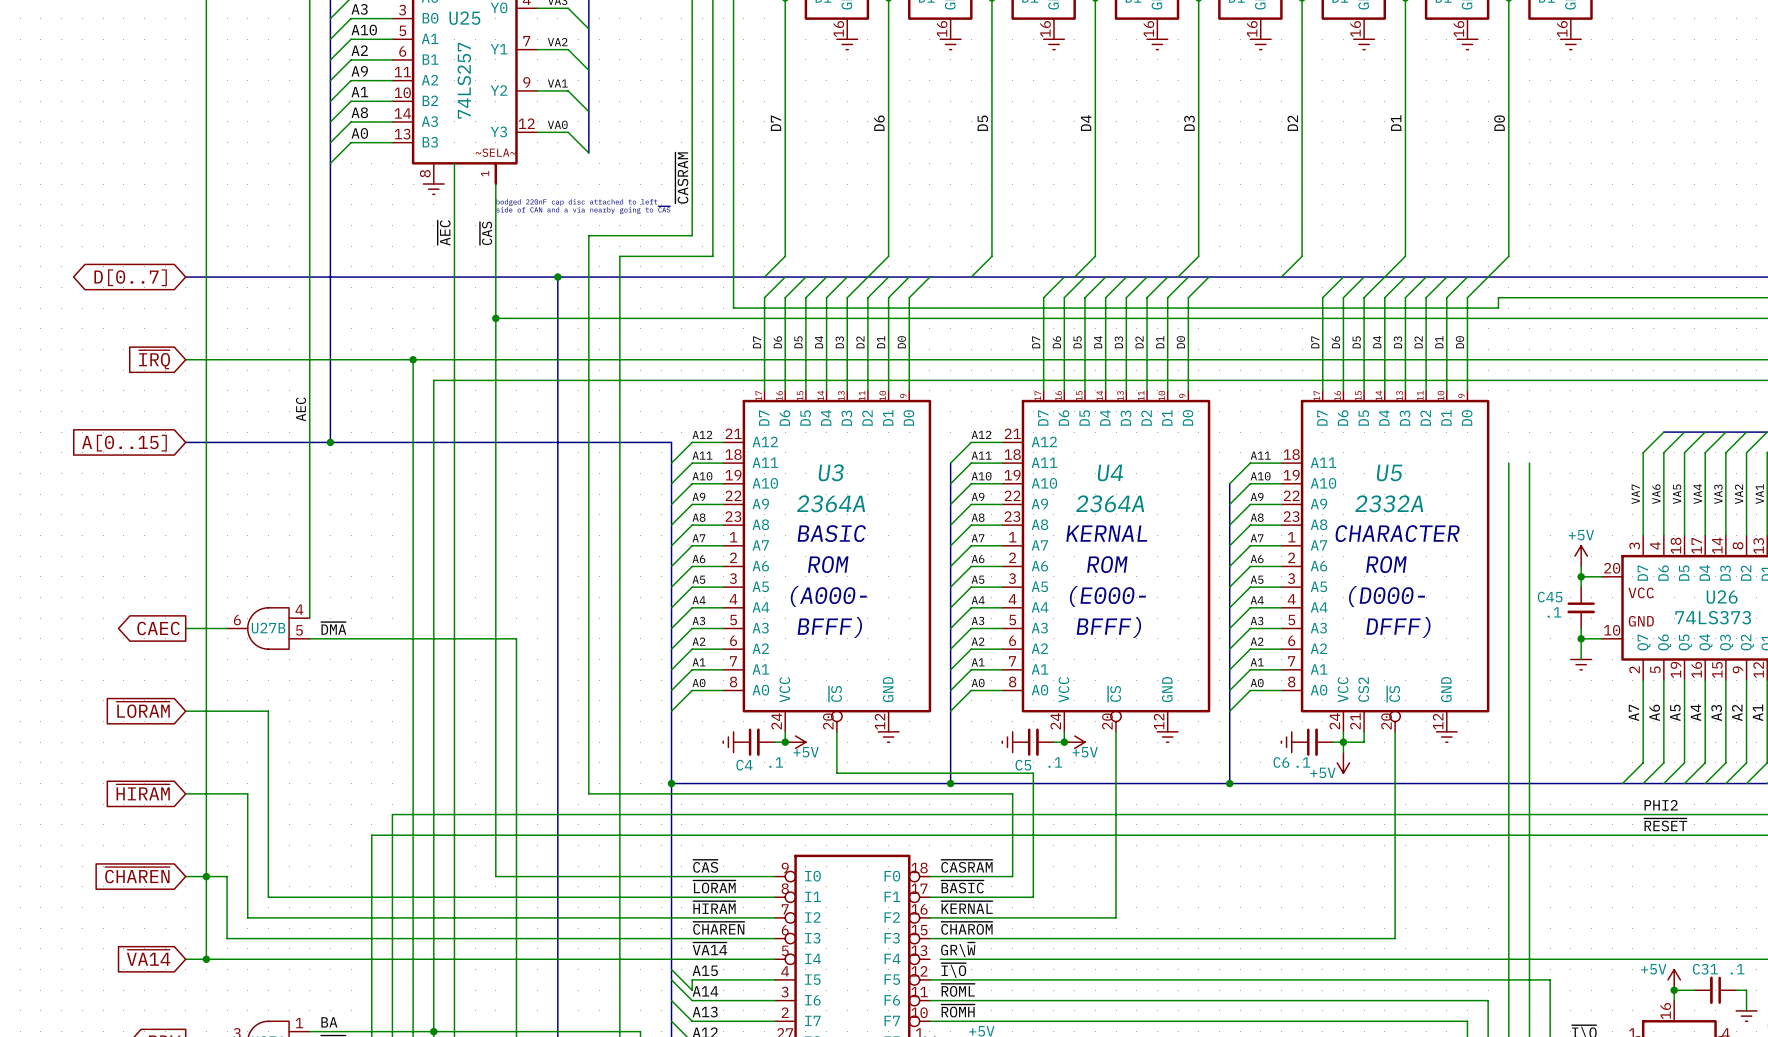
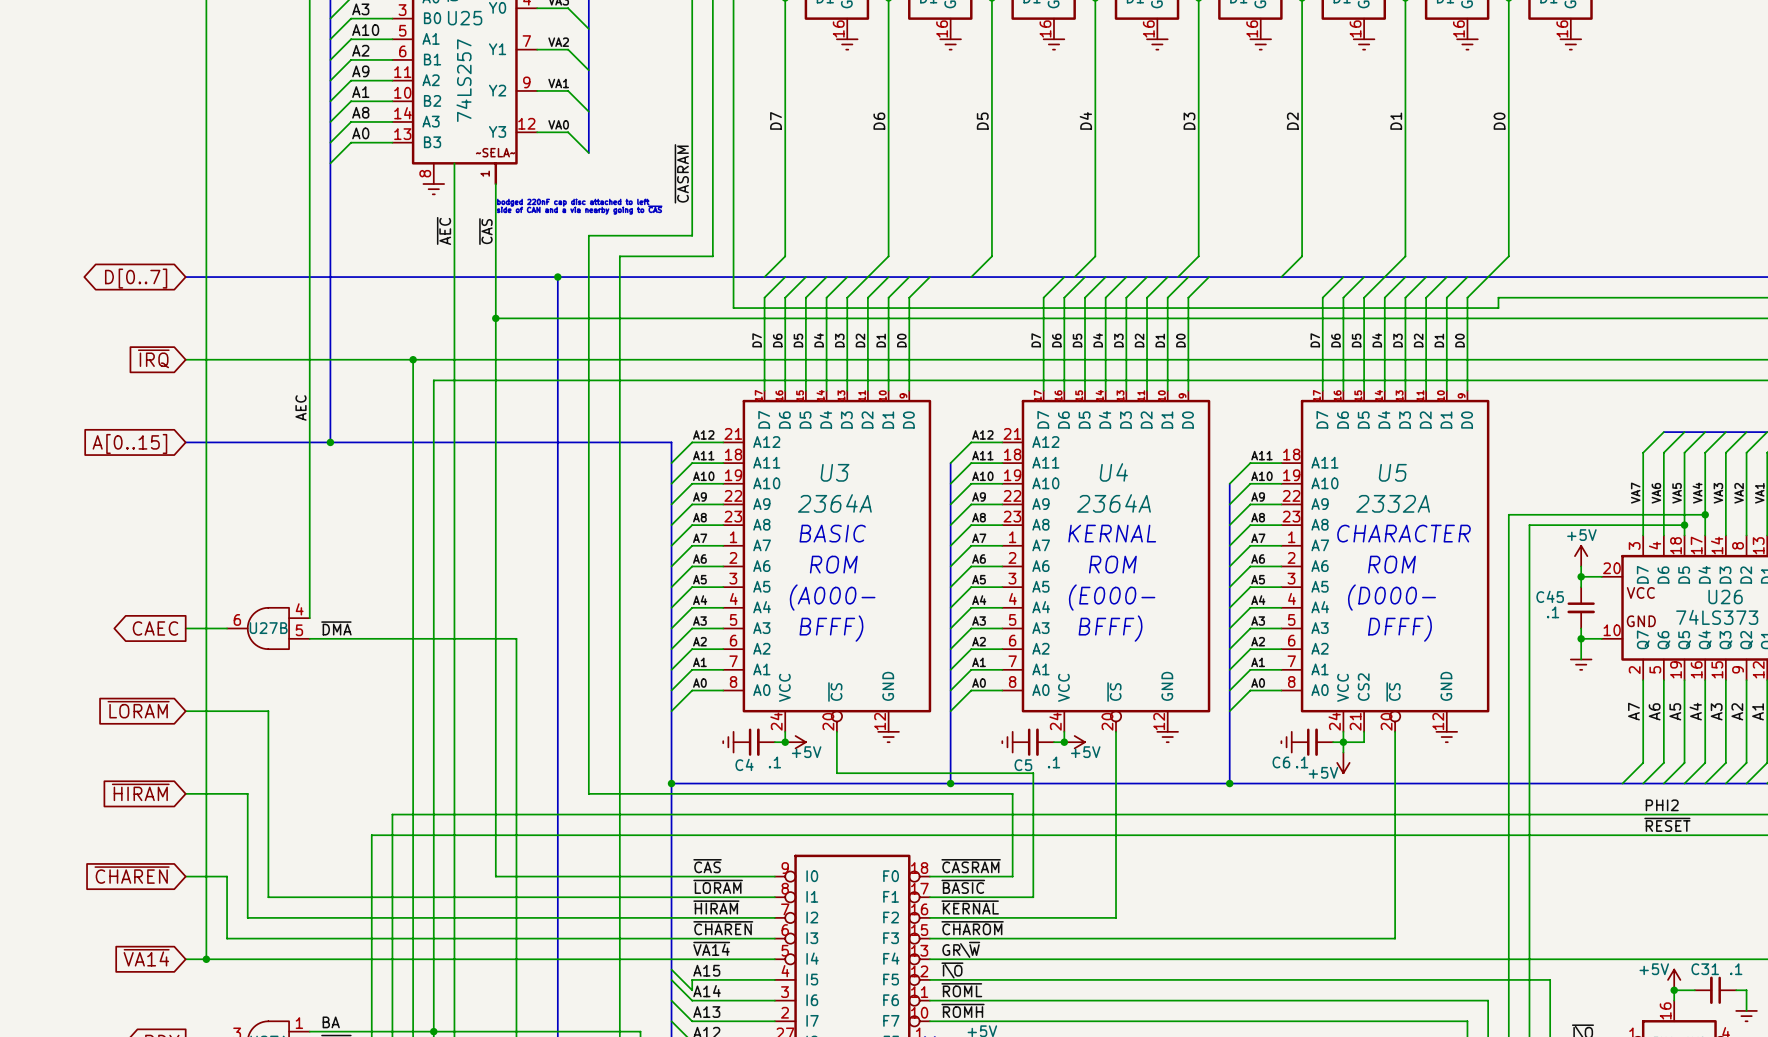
wire: (1508, 463) (1508, 514) -> (1705, 514) (1508, 514)
wire: (1529, 463) (1529, 525) -> (1684, 525) (1529, 525)
junction: none -> (1705, 514)
junction: none -> (1684, 525)
junction: (206, 876) -> none
wire: none -> (929, 959) (940, 959)

